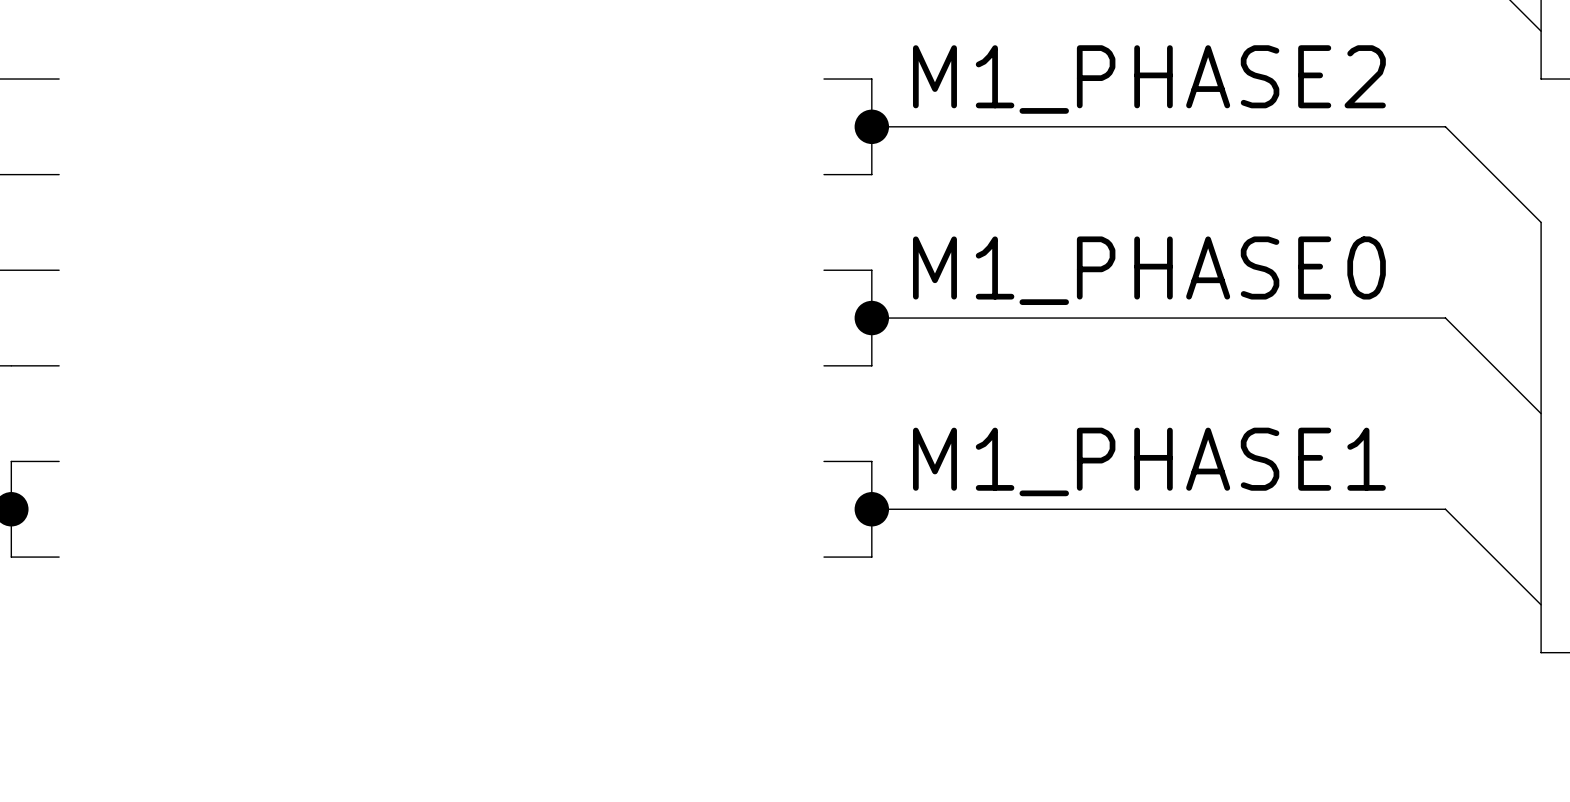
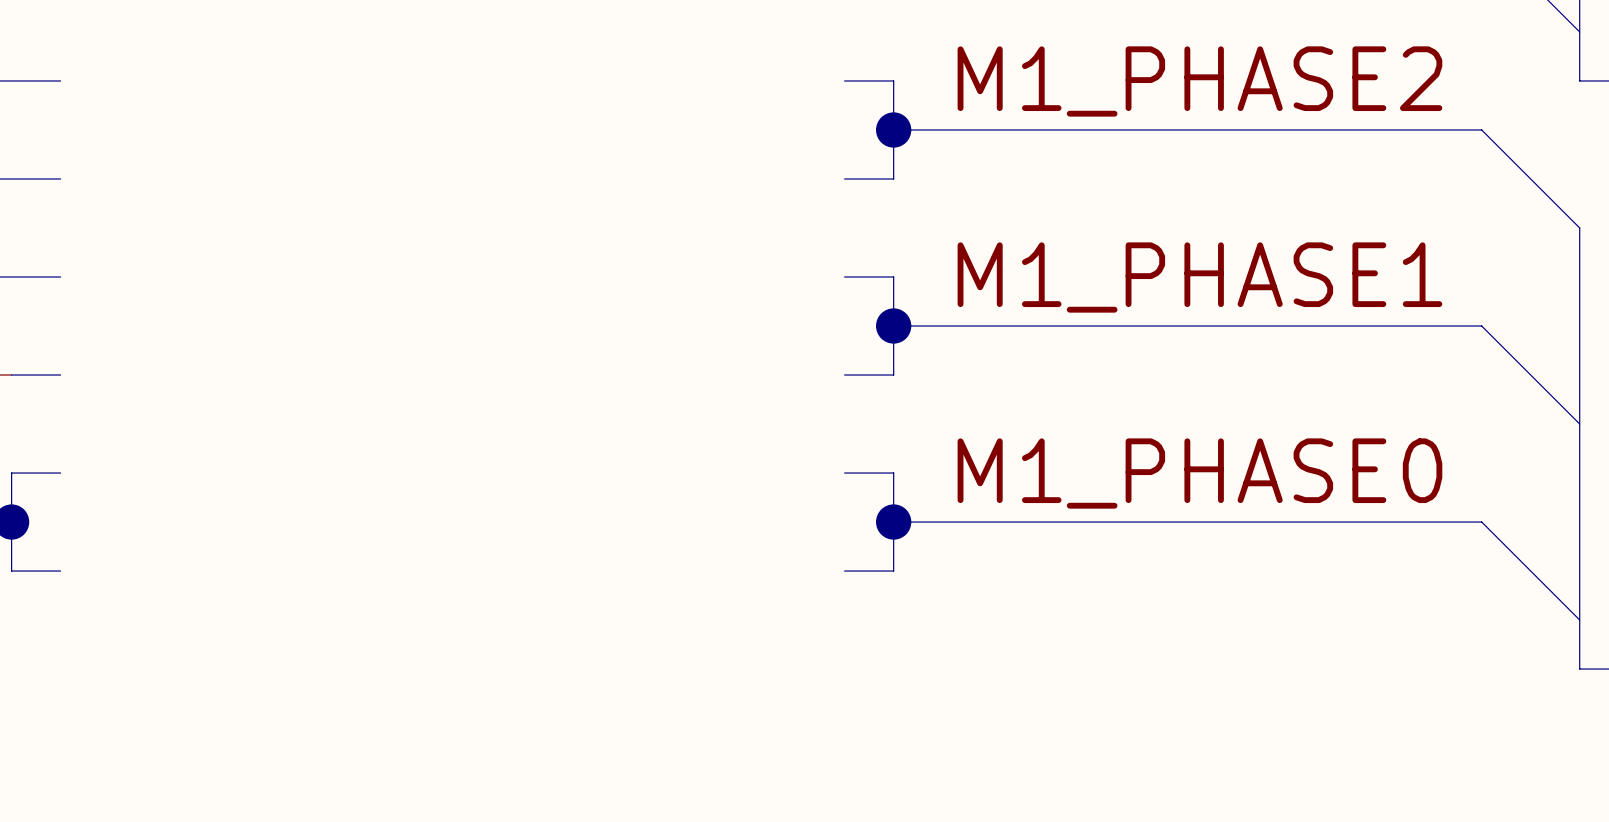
label position: M1_PHASE2 (1149, 79) -> M1_PHASE2 (1199, 81)
label position: M1_PHASE0 (1149, 270) -> M1_PHASE0 (1199, 473)
label position: M1_PHASE1 (1149, 461) -> M1_PHASE1 (1199, 277)

